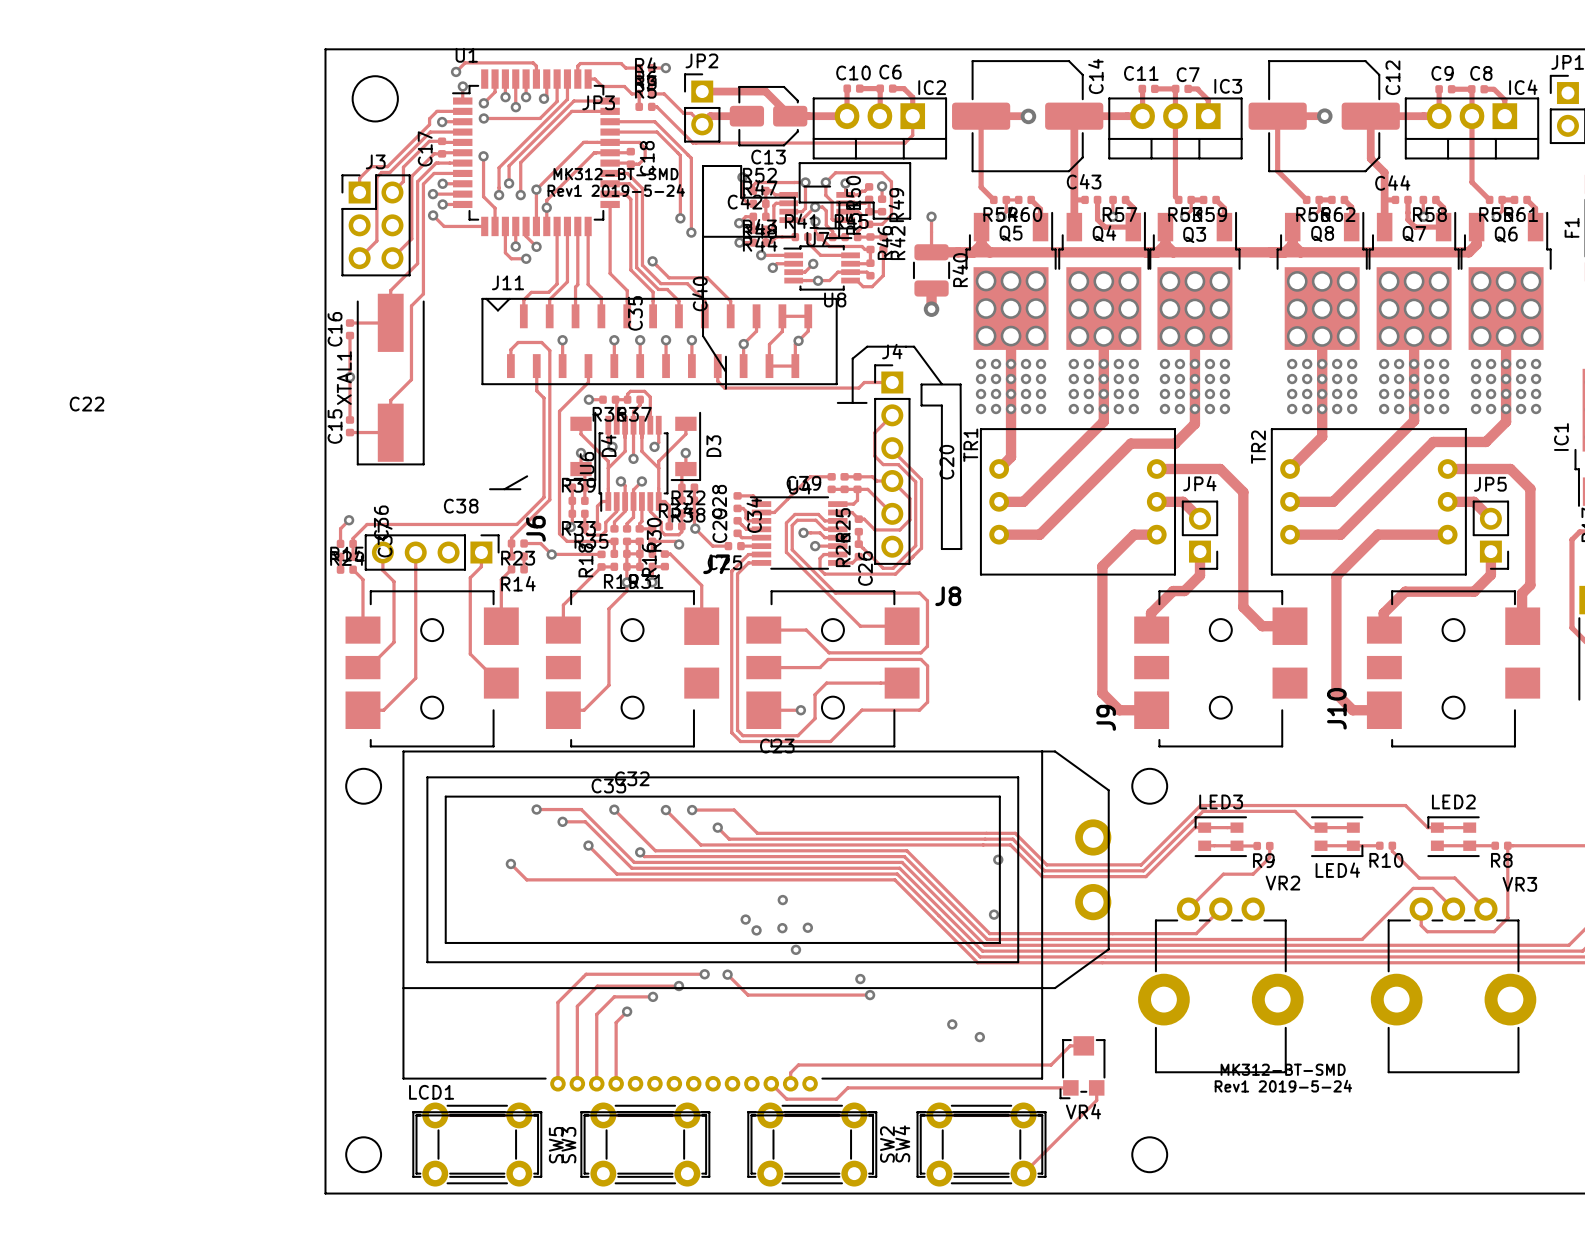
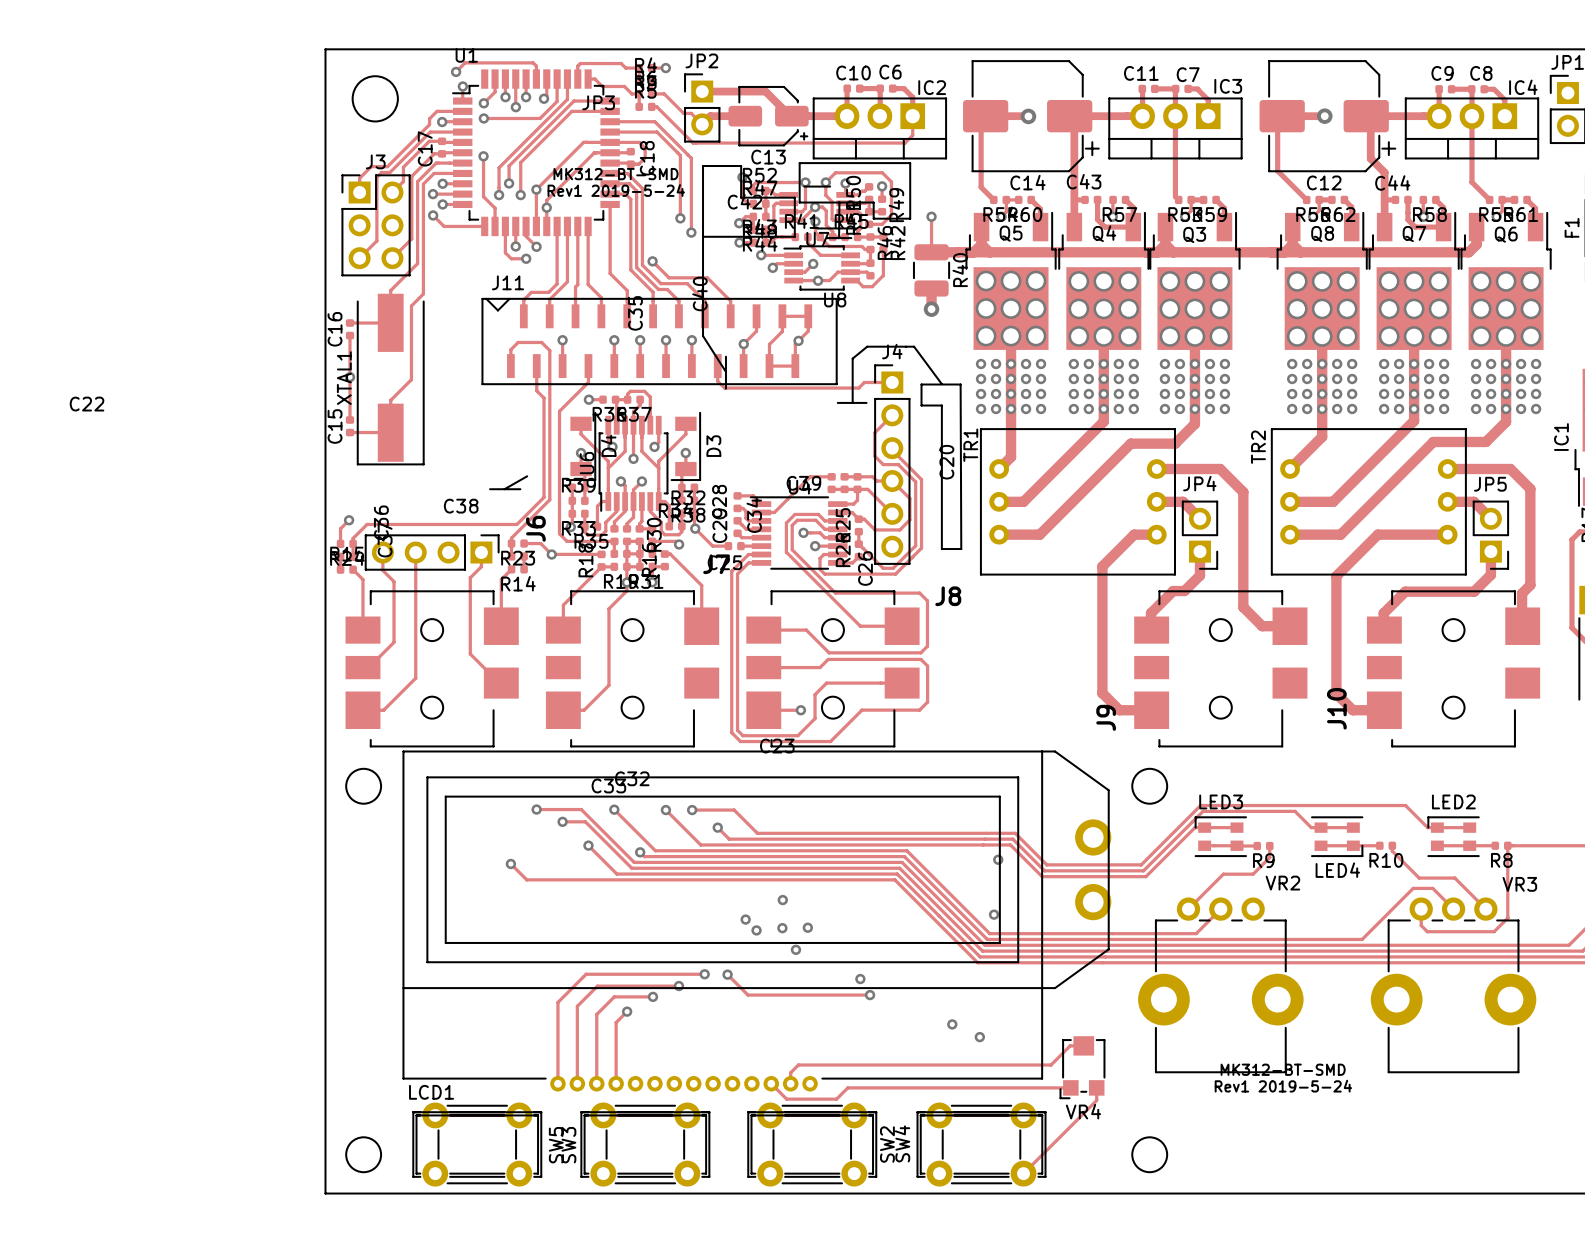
C14 footprint: [952, 60, 1104, 173] -> [963, 60, 1100, 173]
C12 footprint: [1248, 60, 1400, 173] -> [1259, 60, 1397, 173]
C14 name position: C14 (1095, 76) -> C14 (1027, 182)
C12 name position: C12 (1392, 77) -> C12 (1324, 182)
C13 footprint: [729, 86, 808, 147] -> [728, 86, 809, 147]

